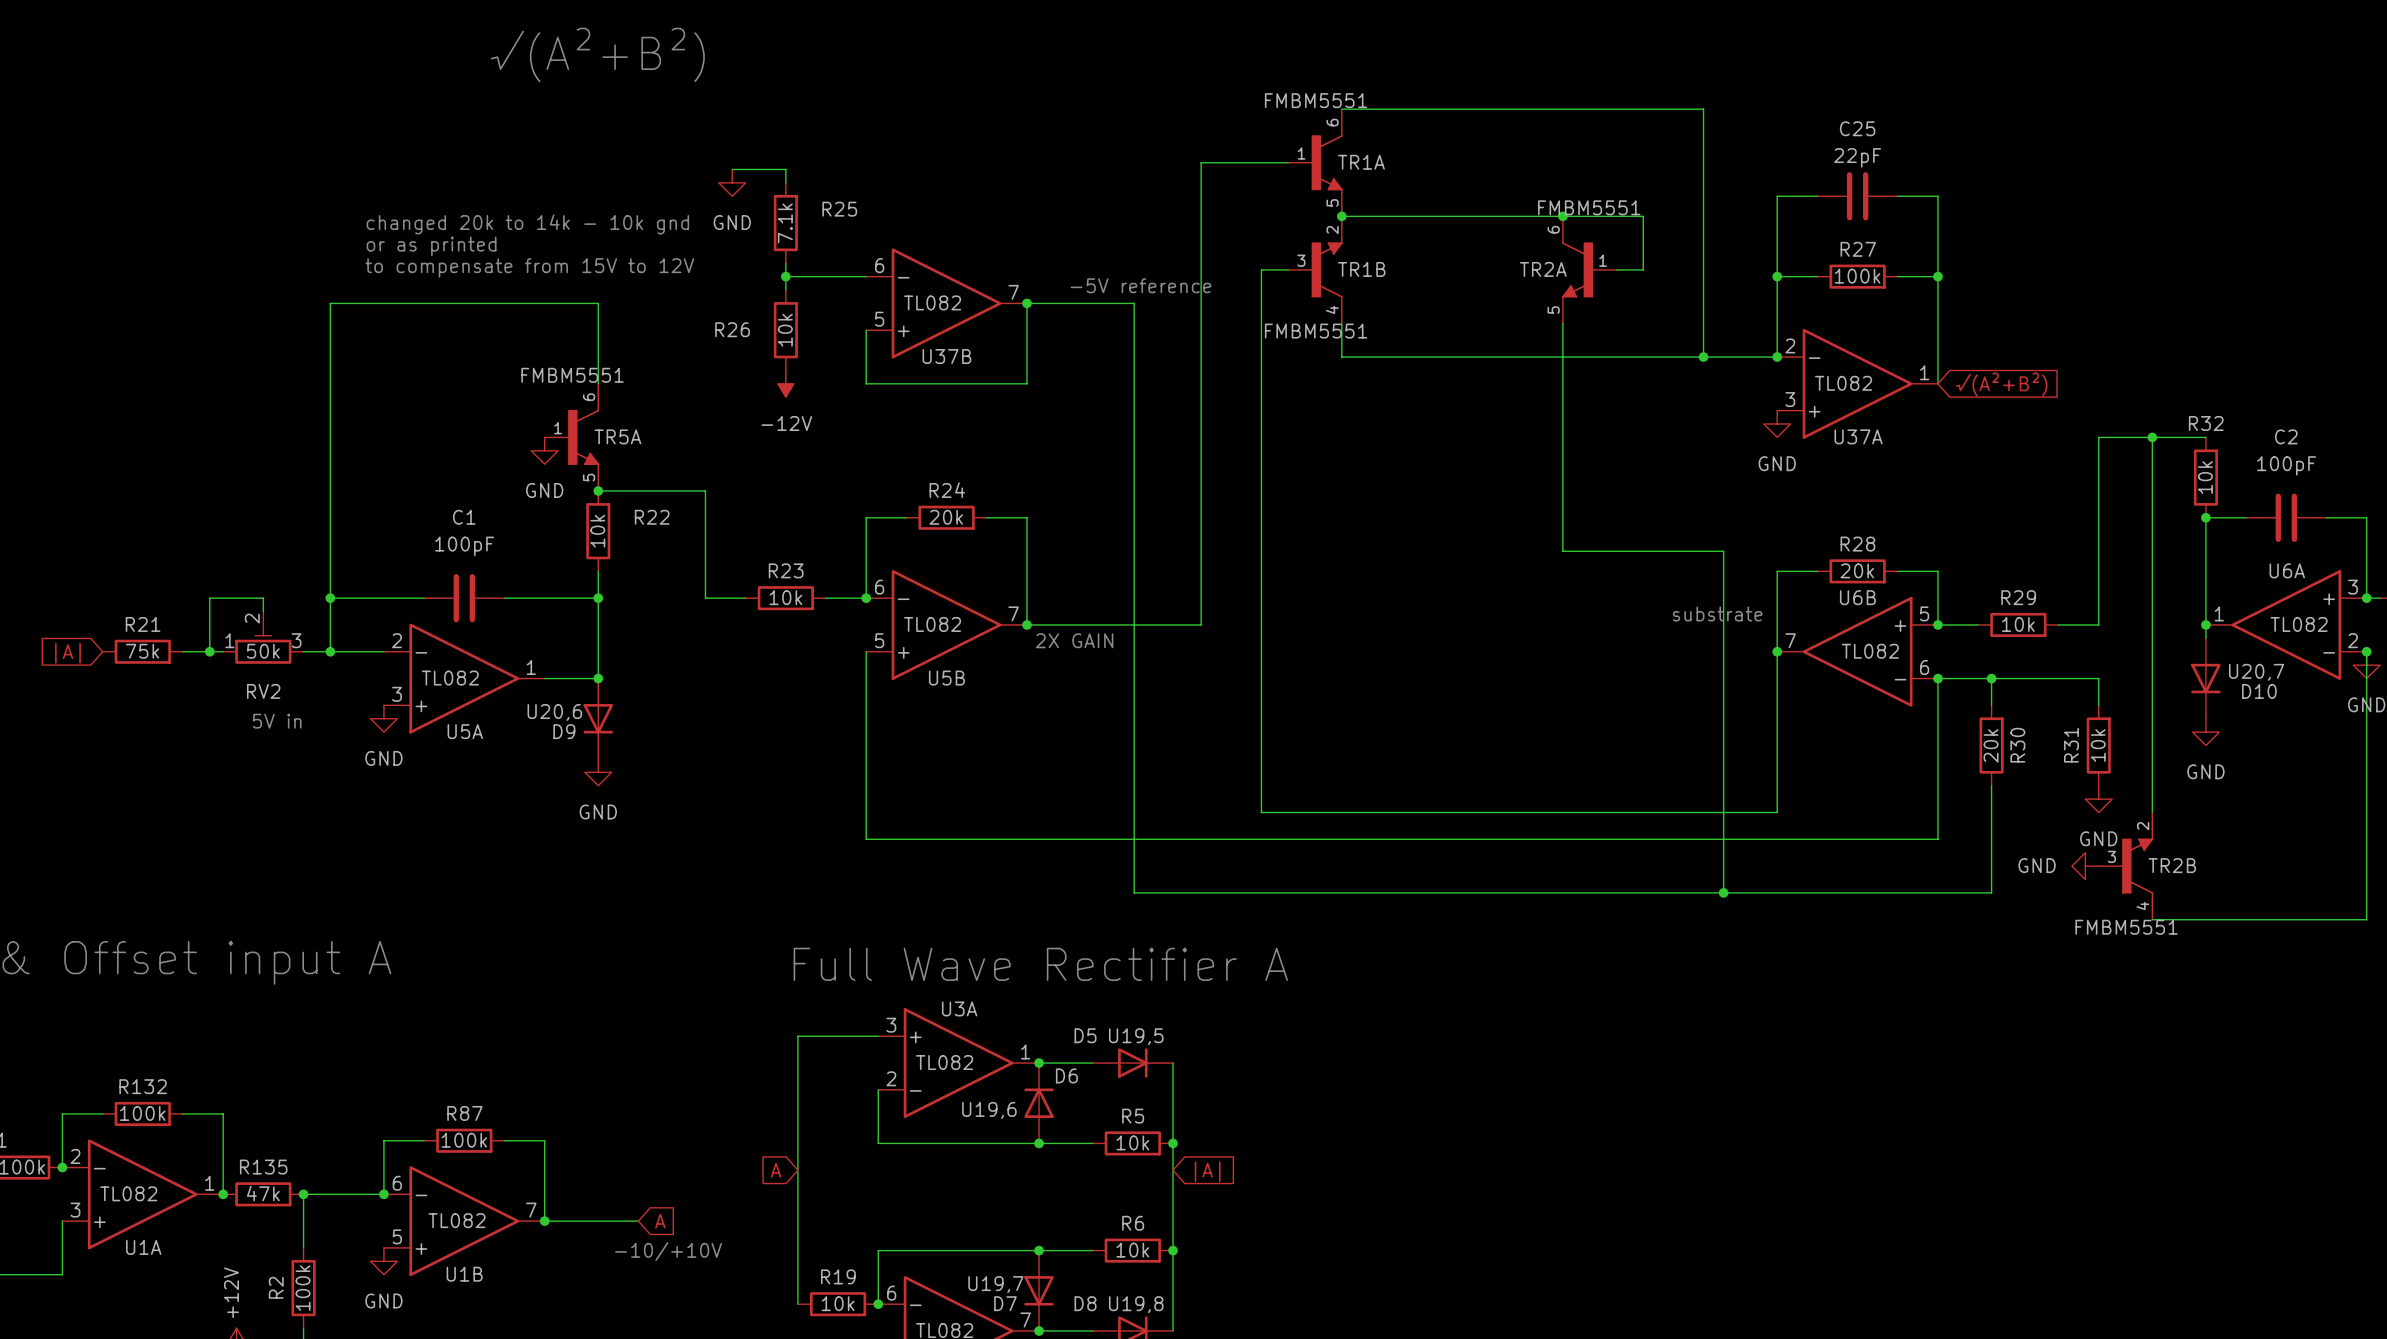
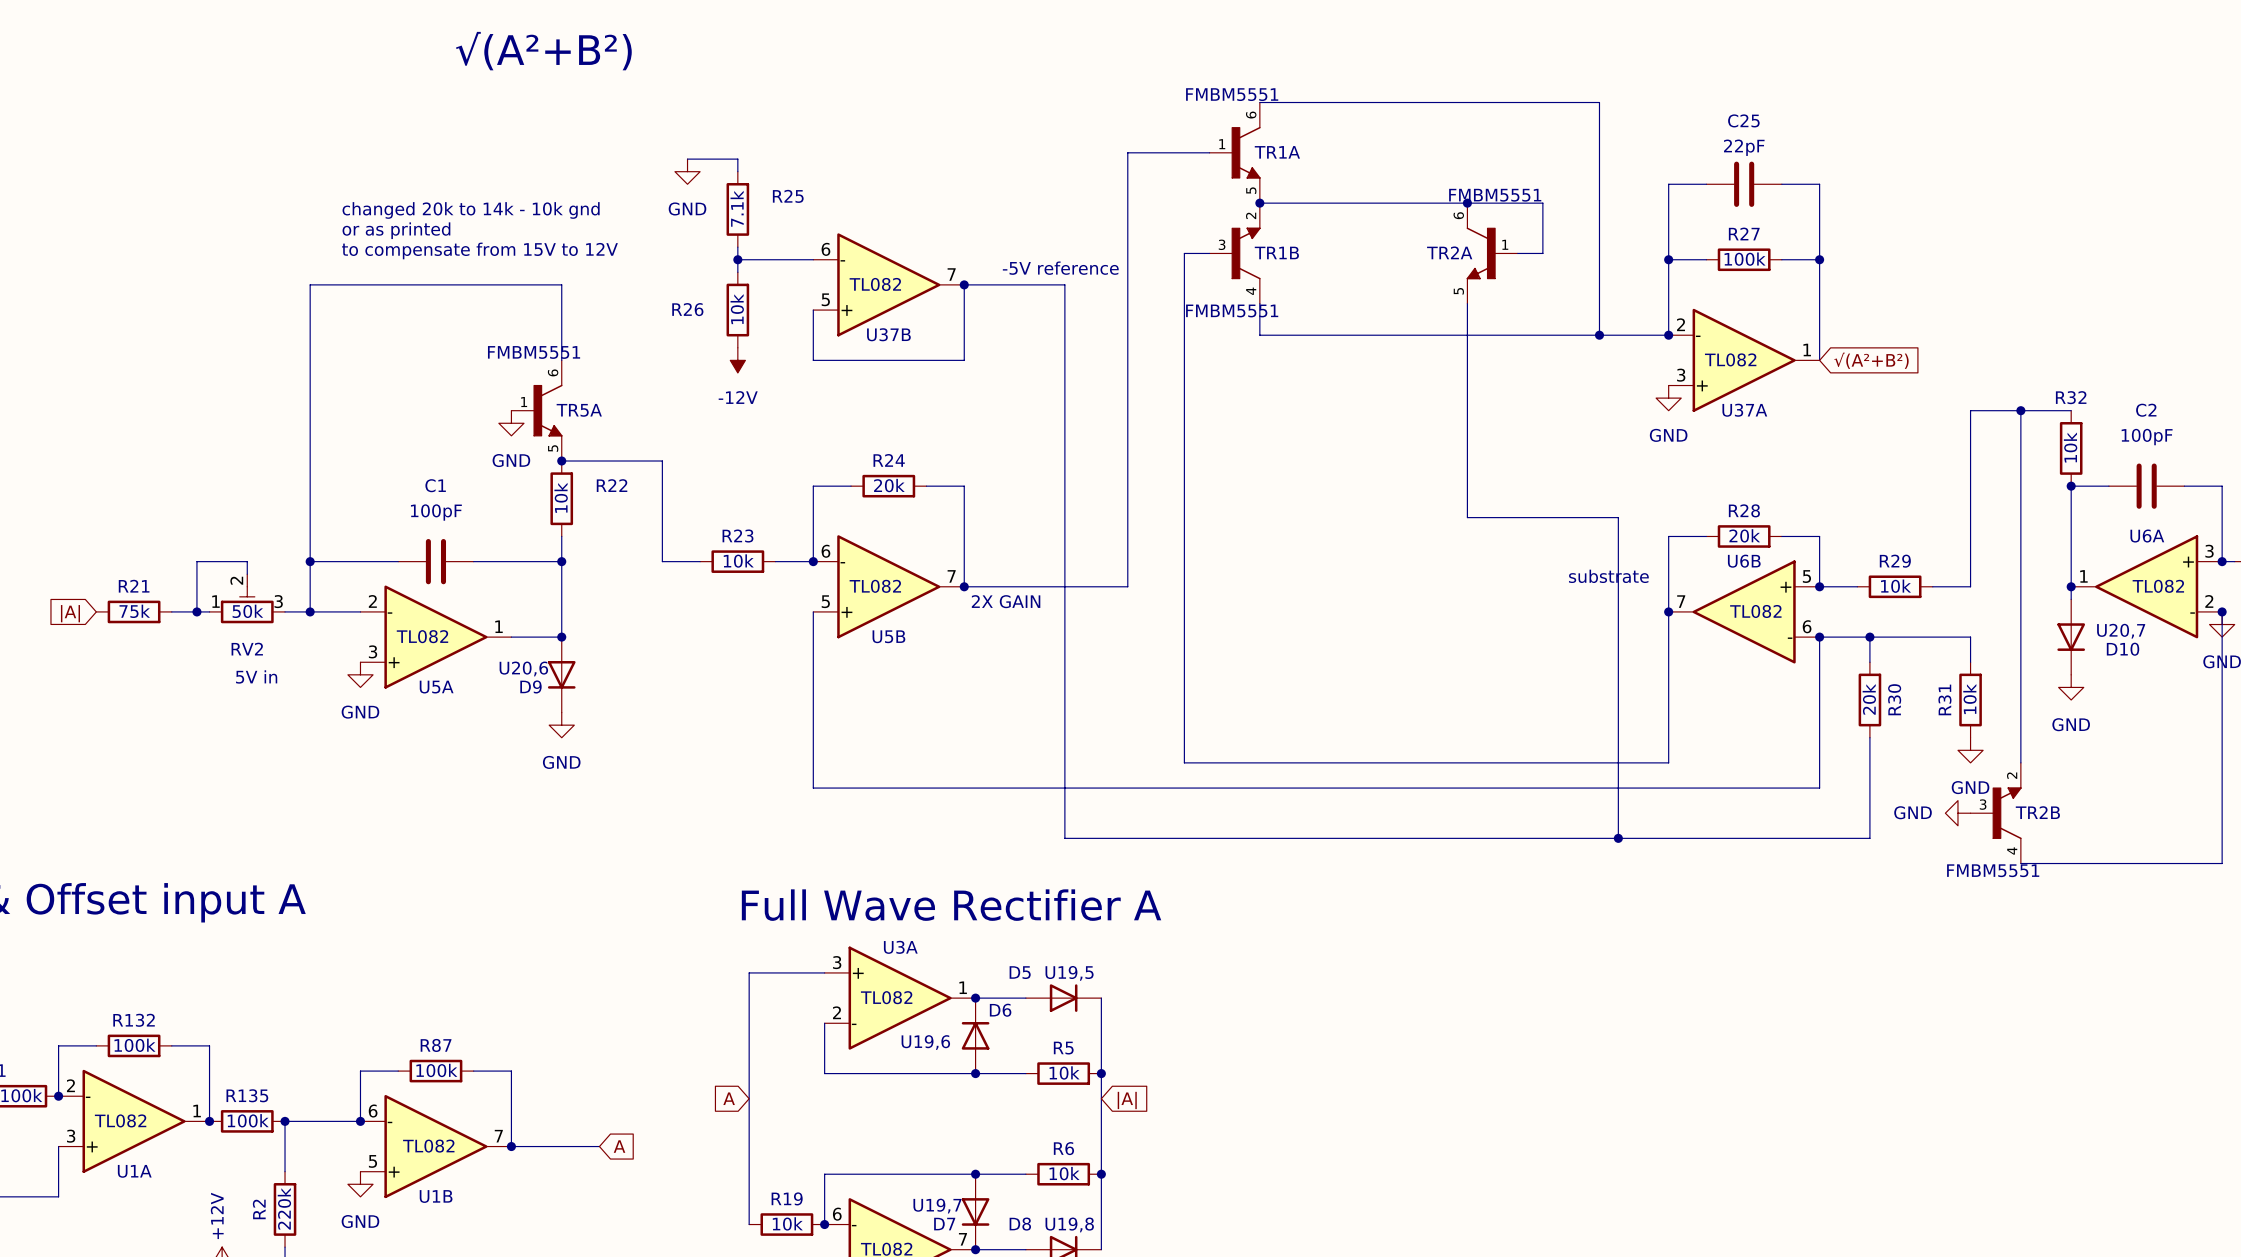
R135 value: 47k (263, 1193) -> 100k (248, 1120)
text: -10/+10V (668, 1251) -> none
R2 value: 100k (303, 1288) -> 220k (284, 1208)

